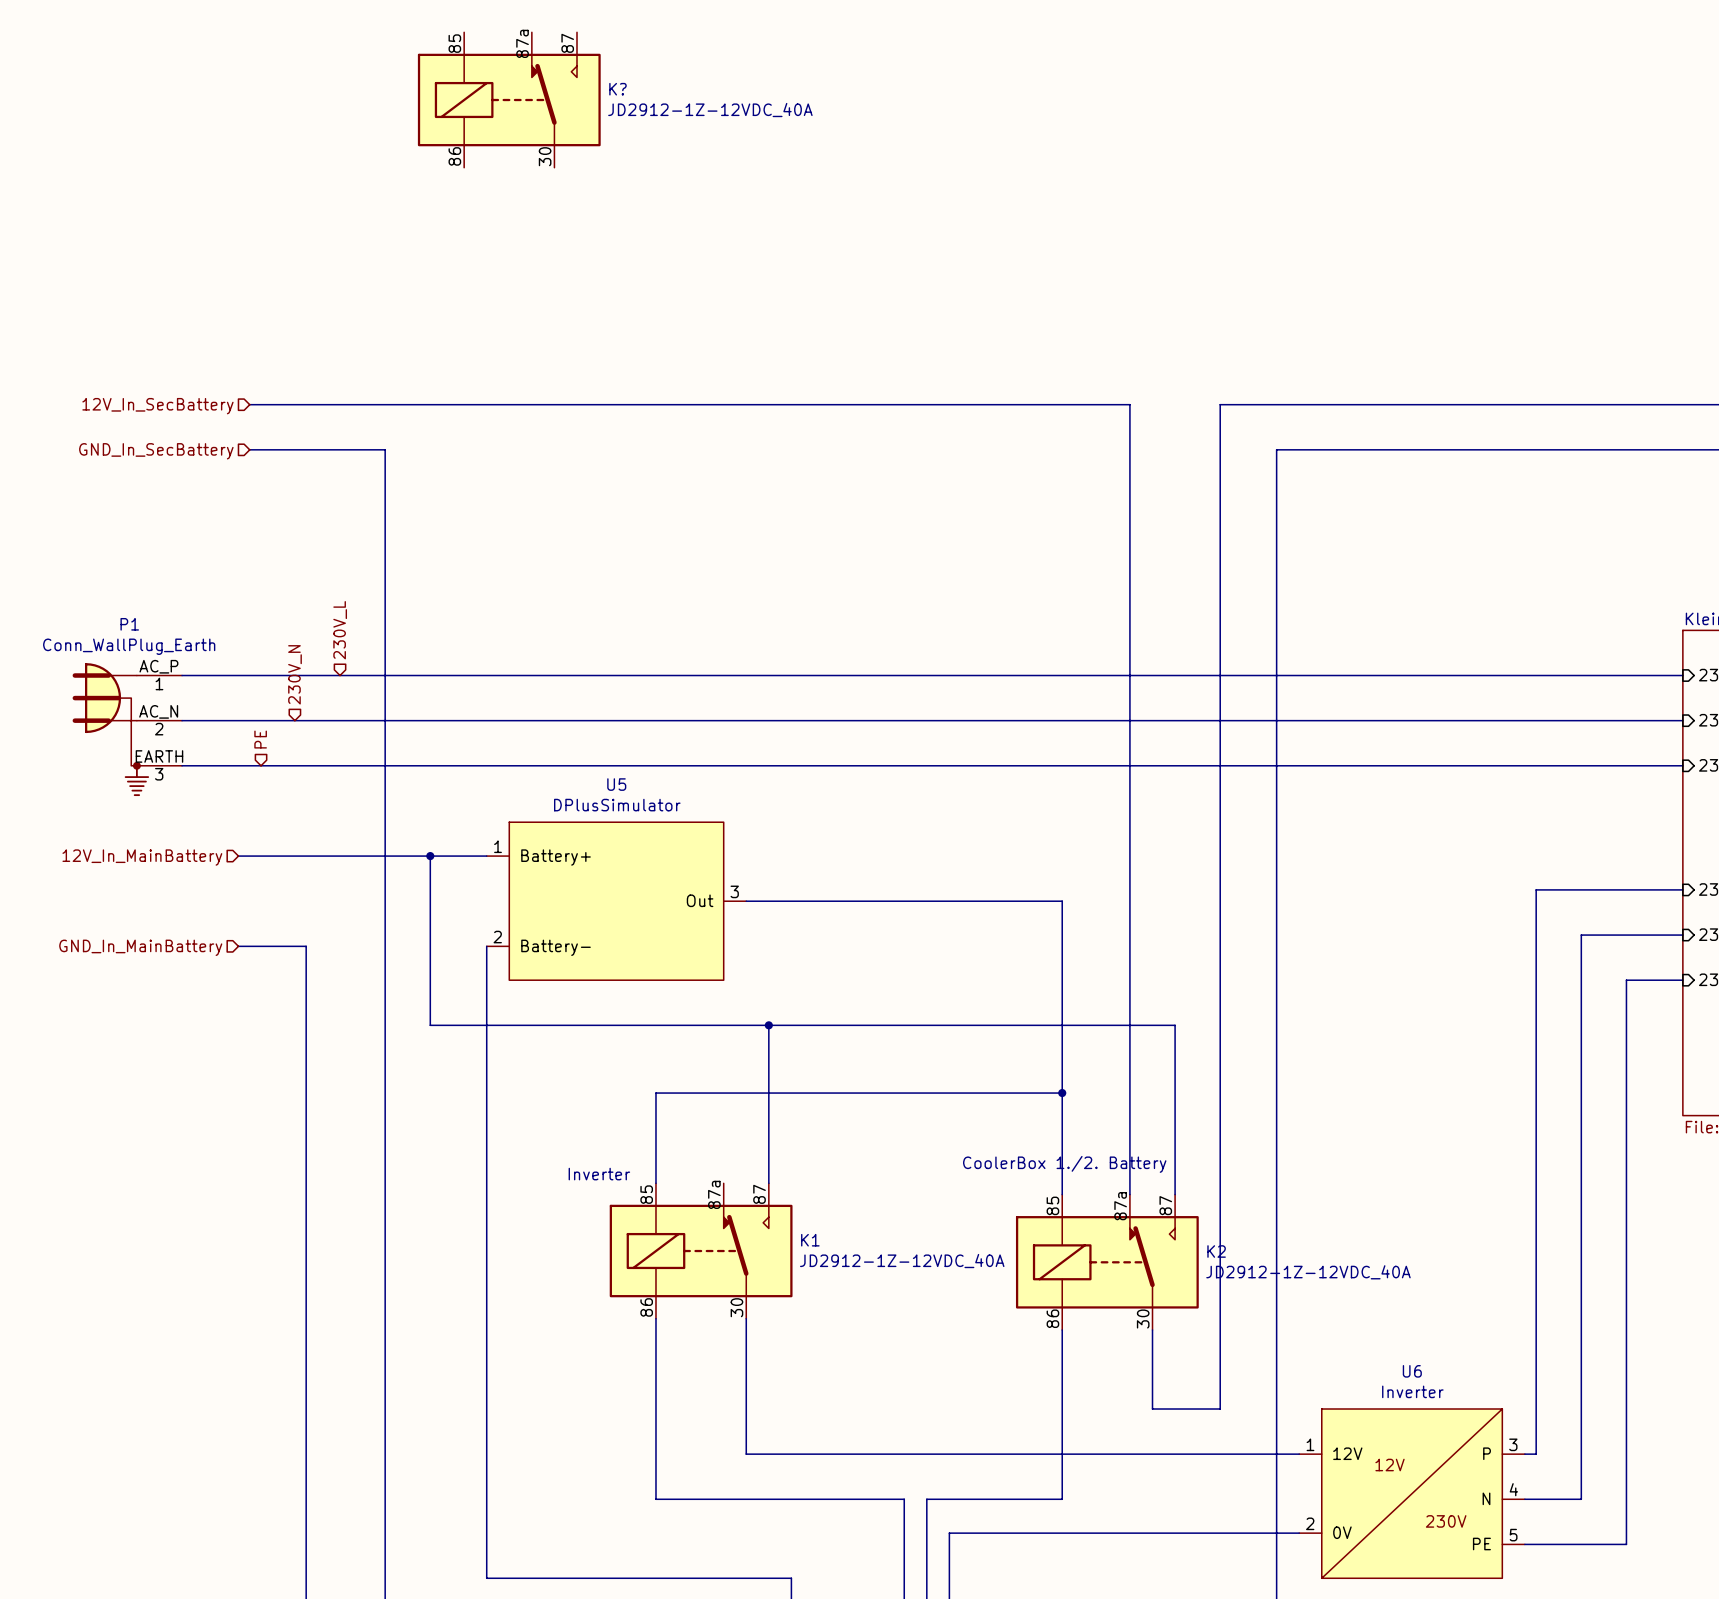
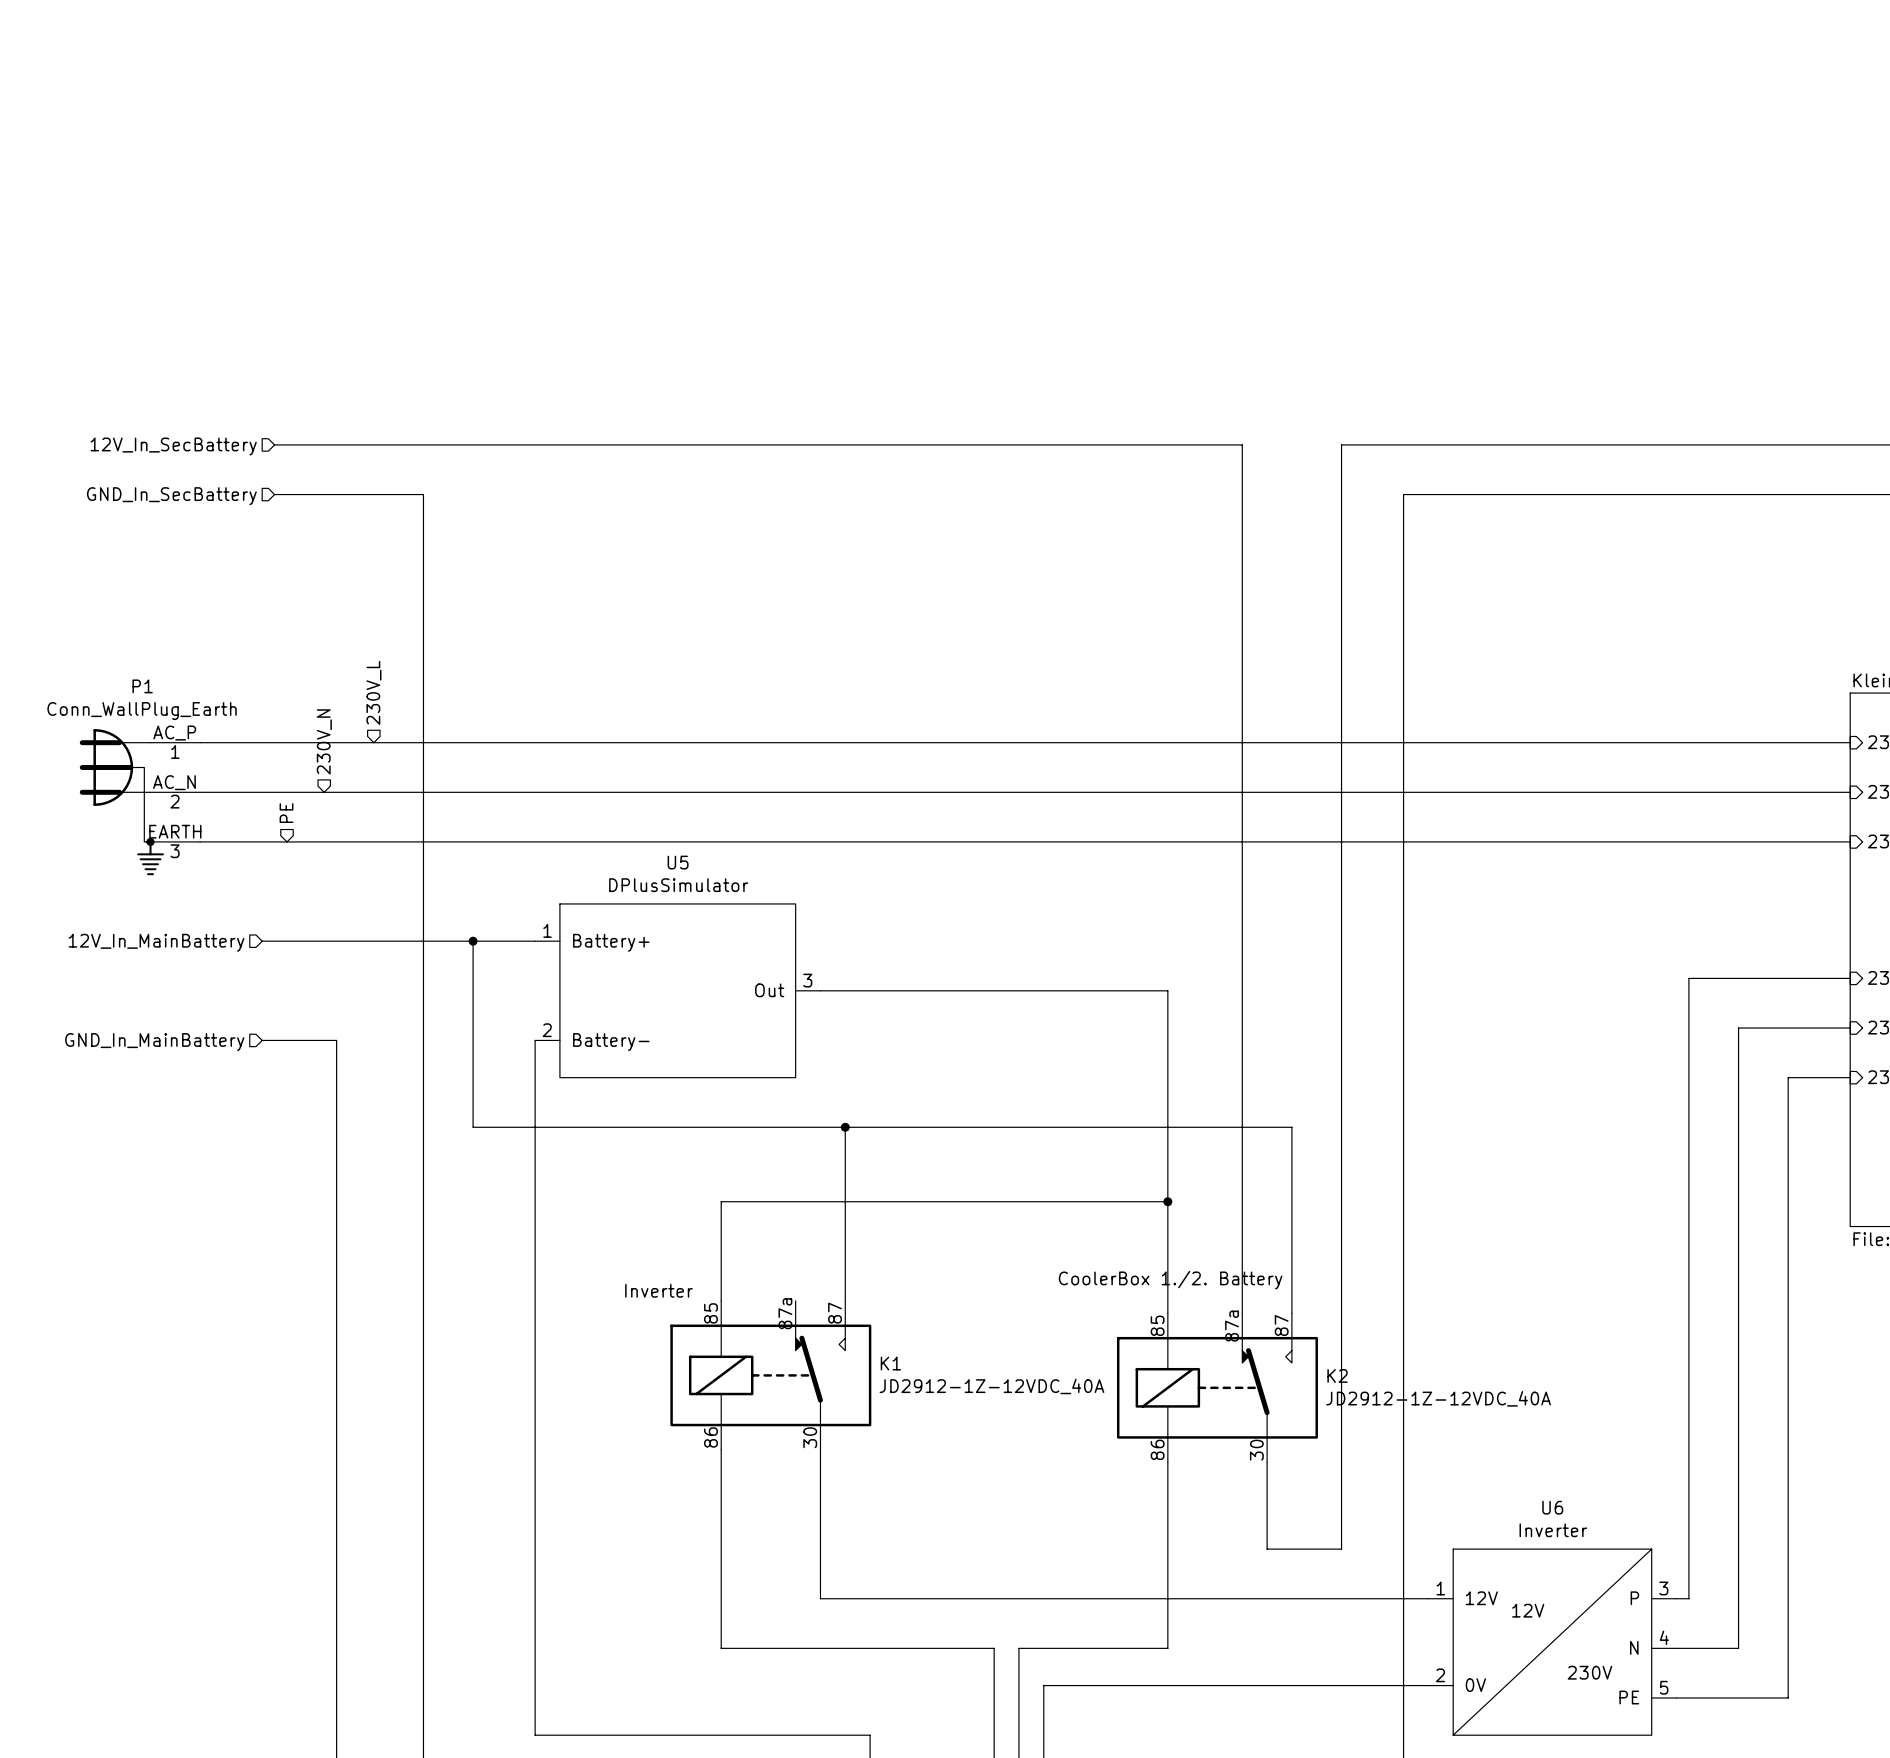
K?: JD2912-1Z-12VDC_40A (509, 100) -> none

